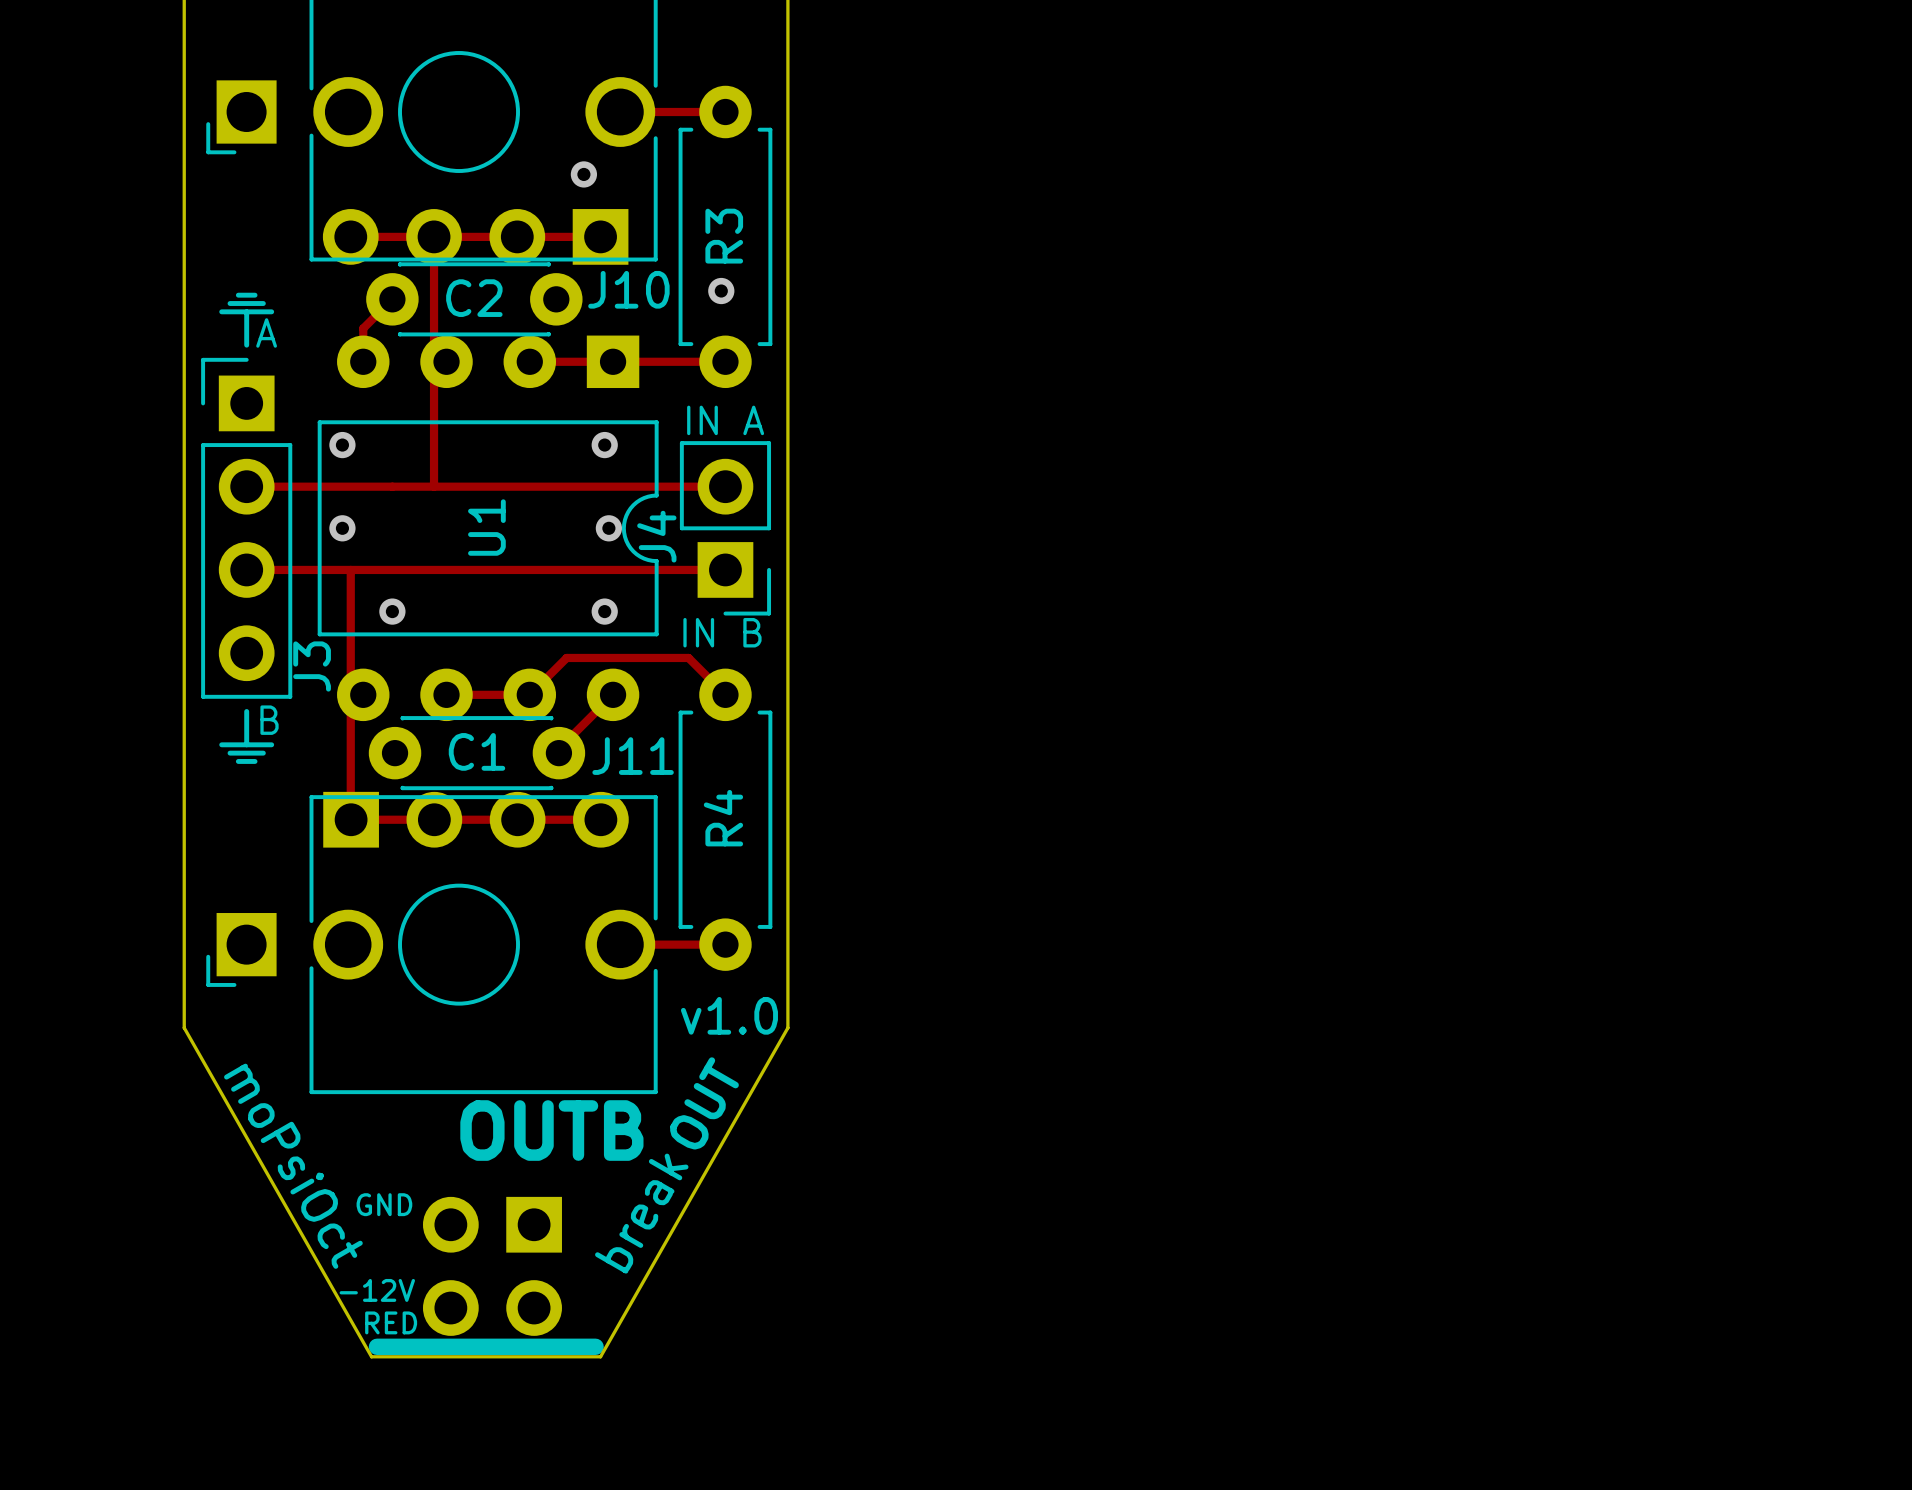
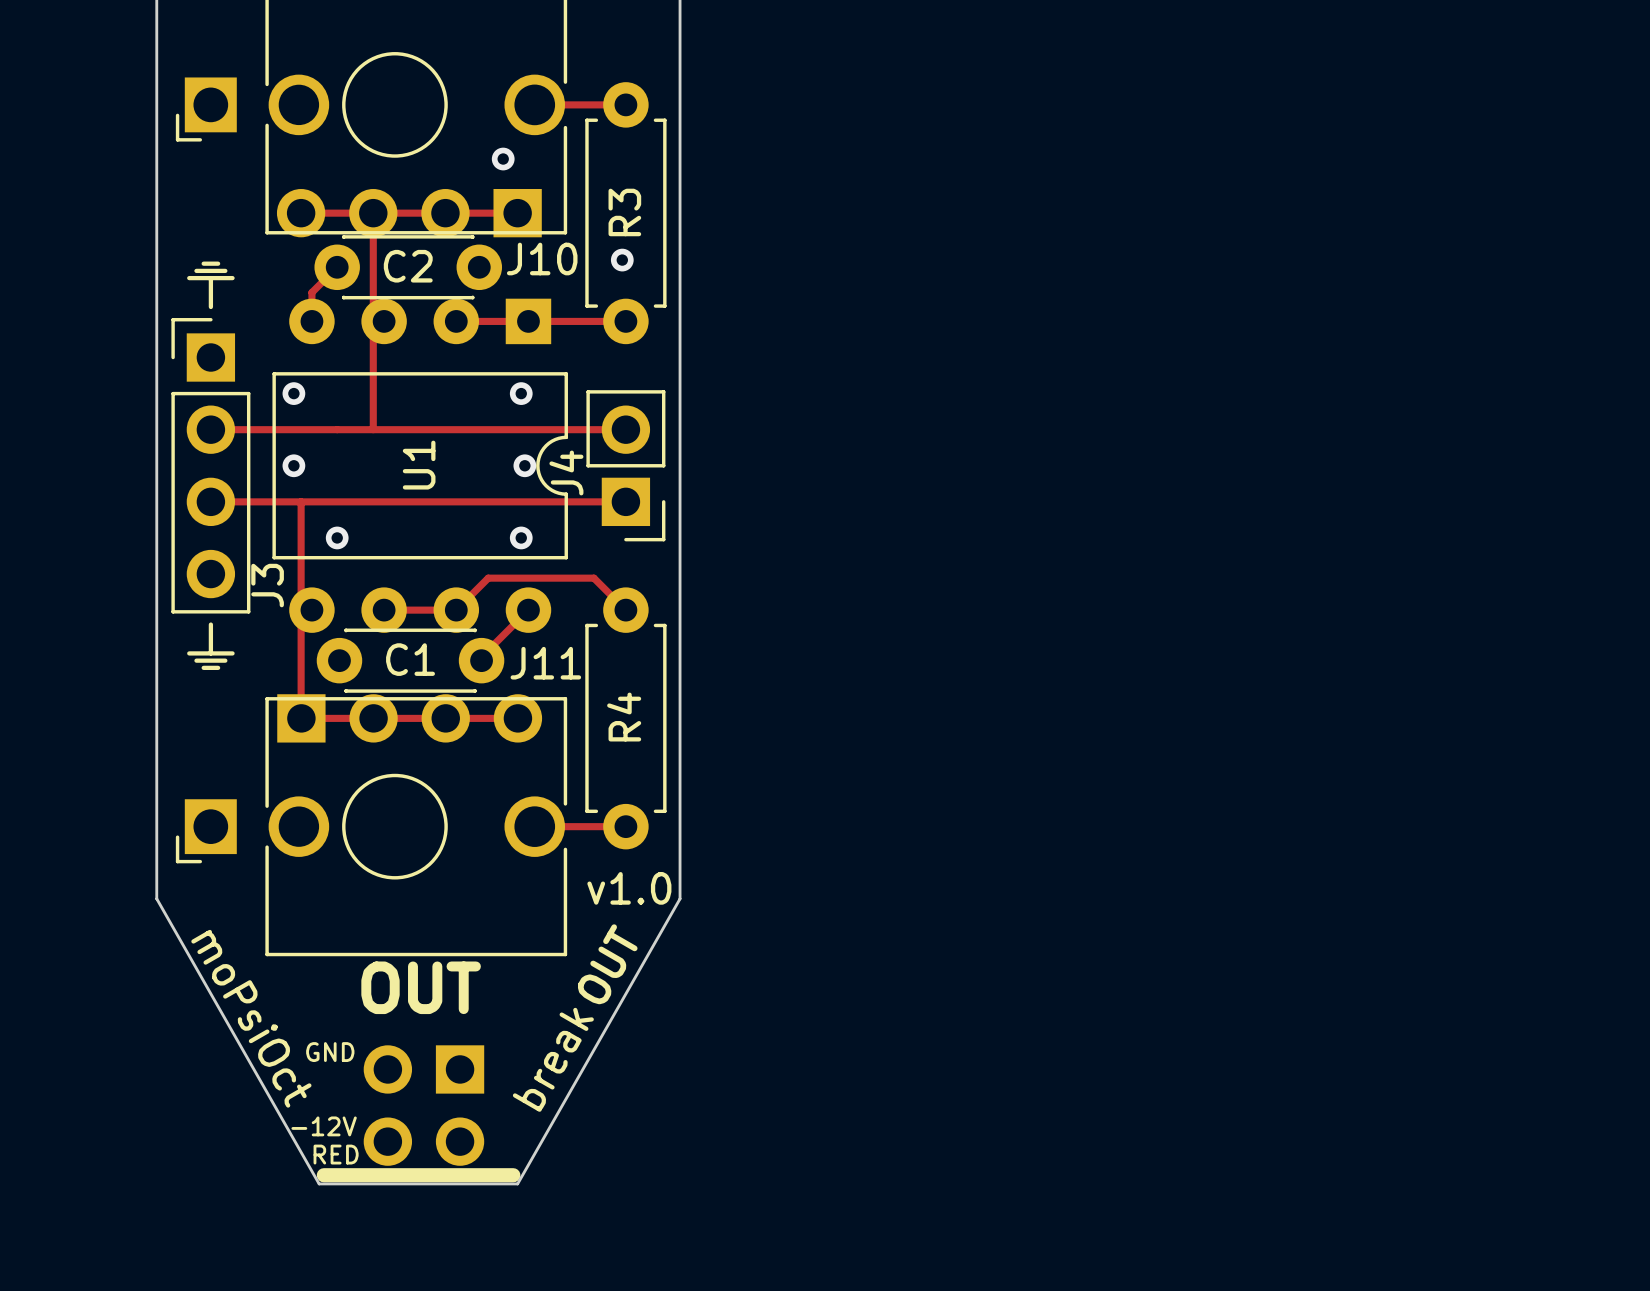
text: A (266, 332) -> none
text: IN A (725, 420) -> none
text: IN B (722, 632) -> none
text: B (269, 720) -> none
text position: OUT (529, 1130) -> OUT (421, 987)
text: B (623, 1130) -> none

